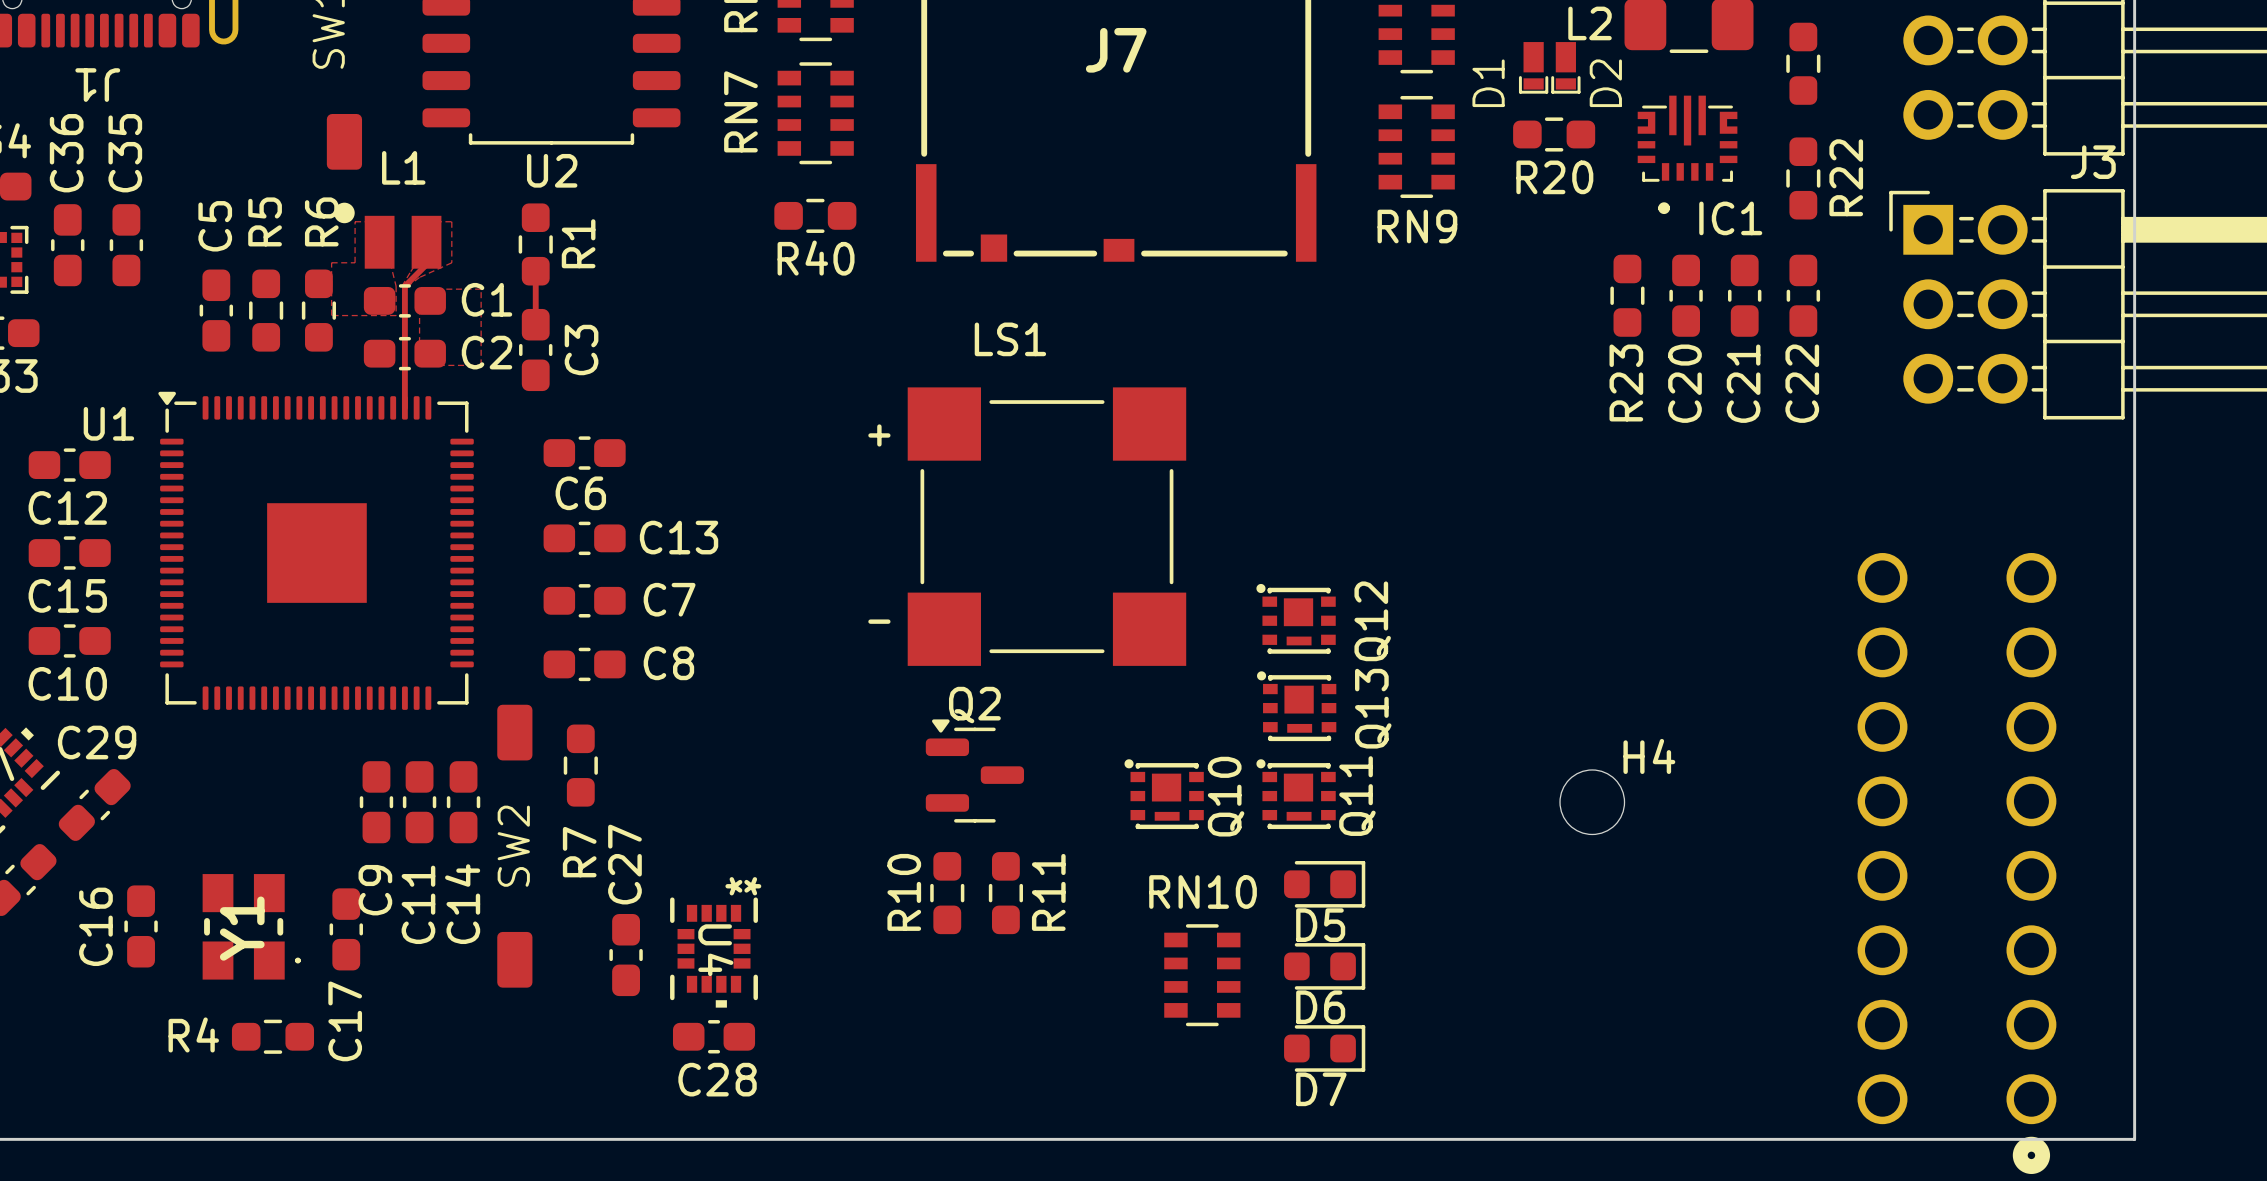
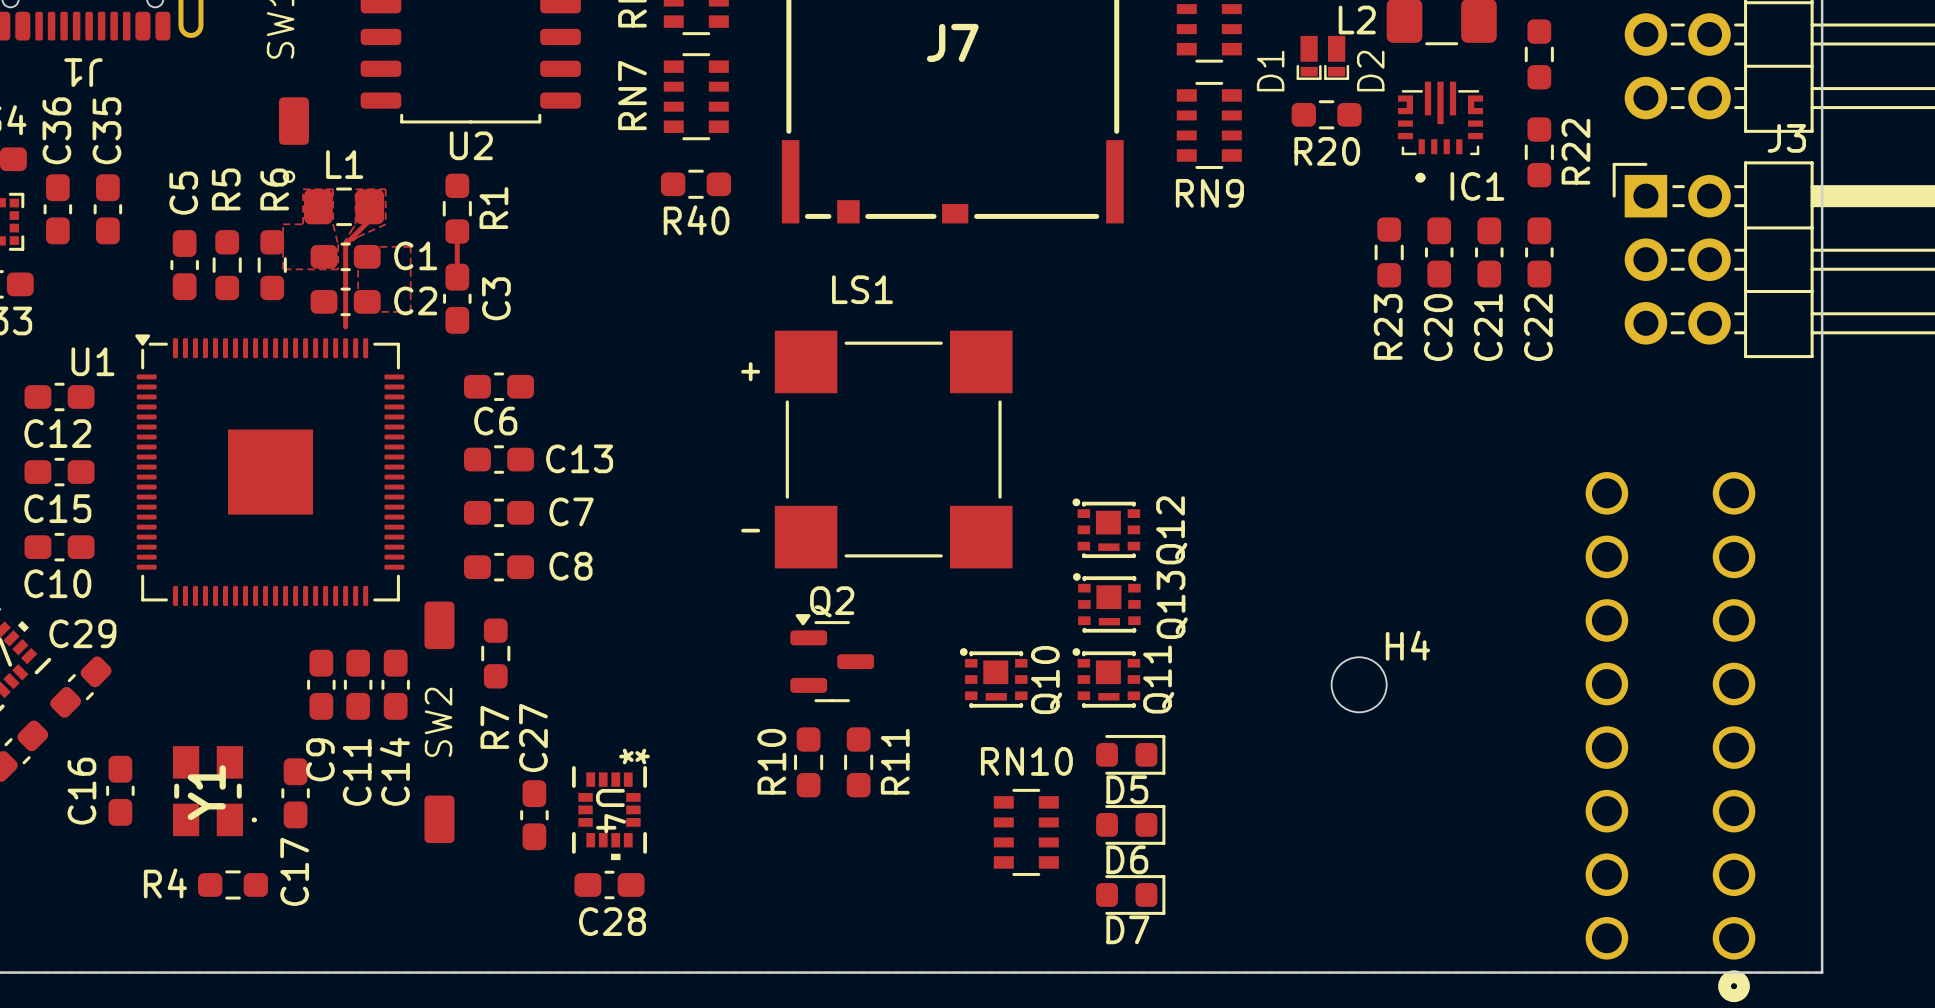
L1 footprint: [334, 202, 442, 269] -> [282, 170, 385, 227]
track: (404, 382) (404, 407) -> none

